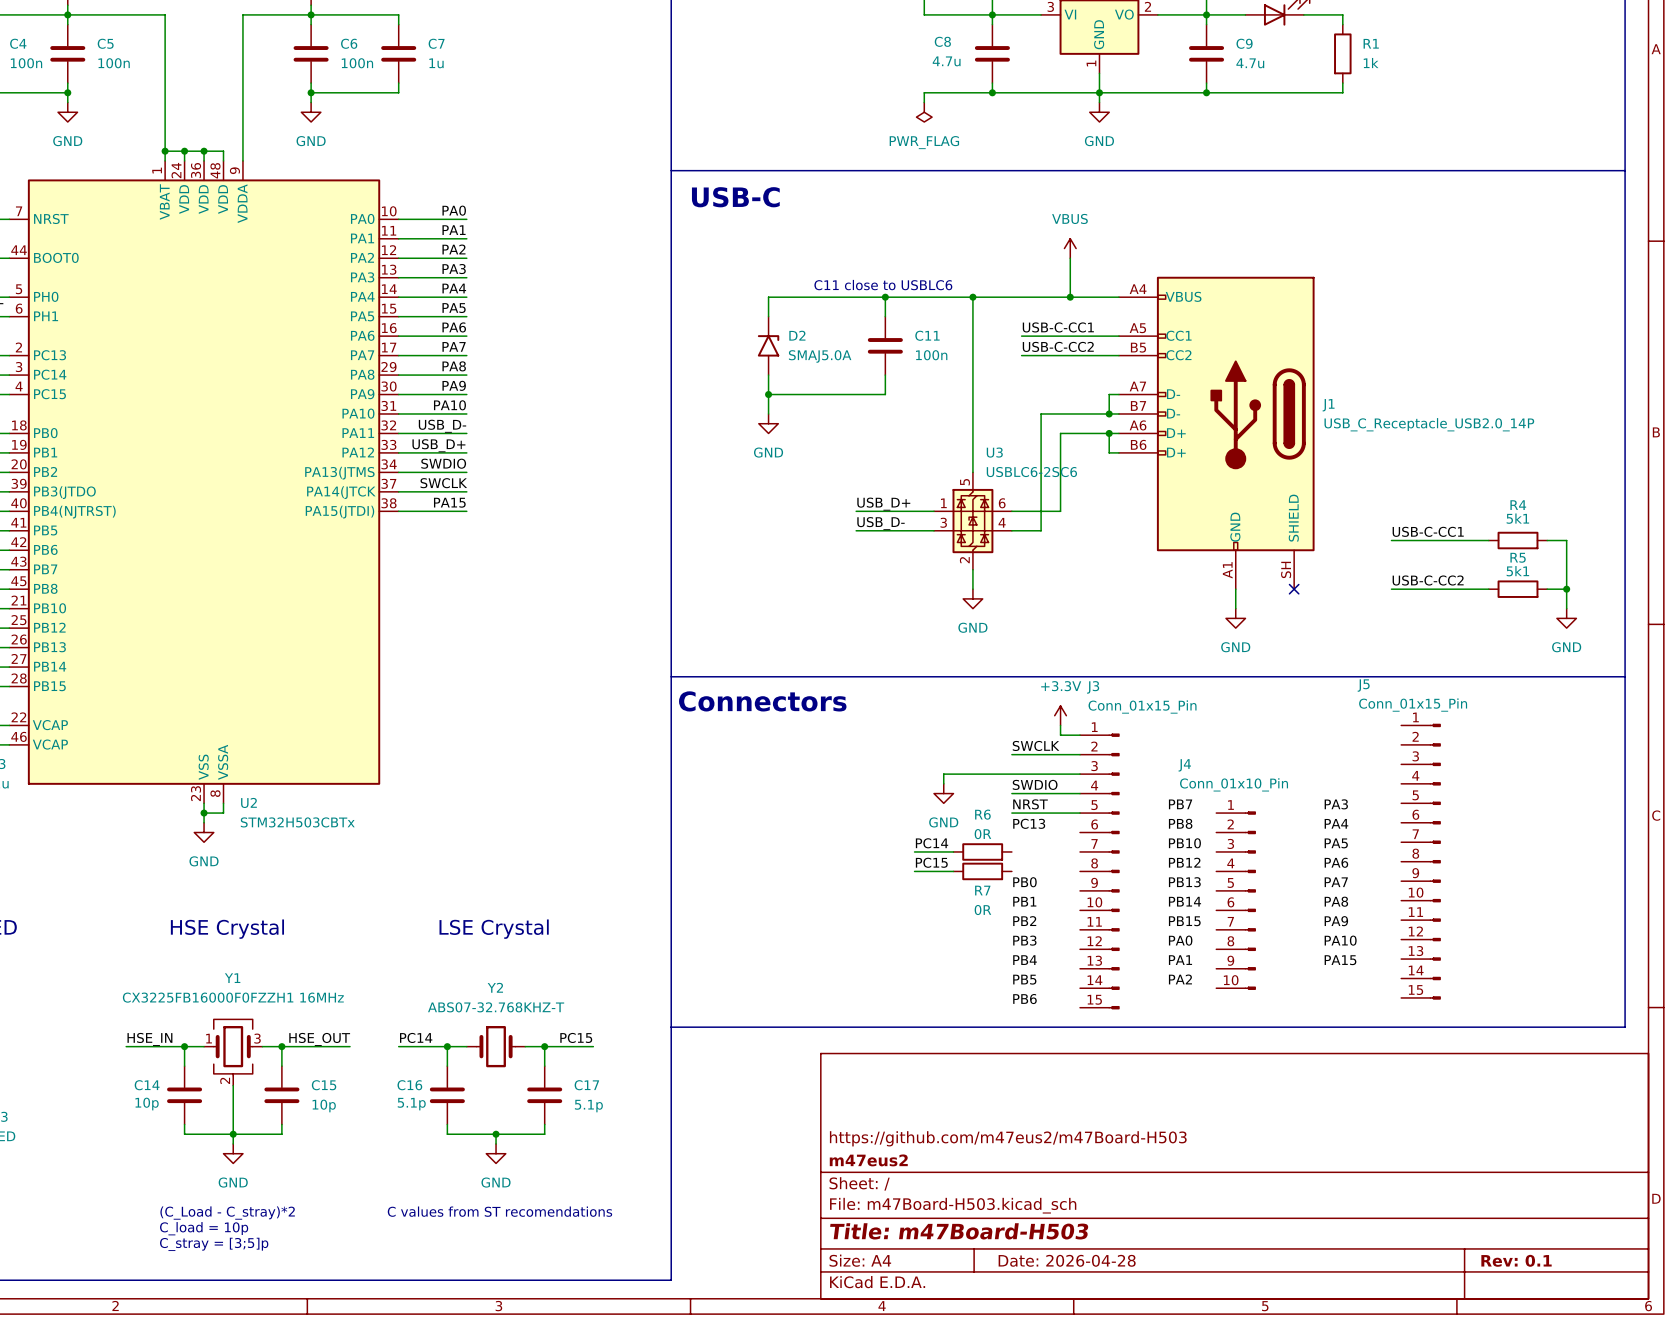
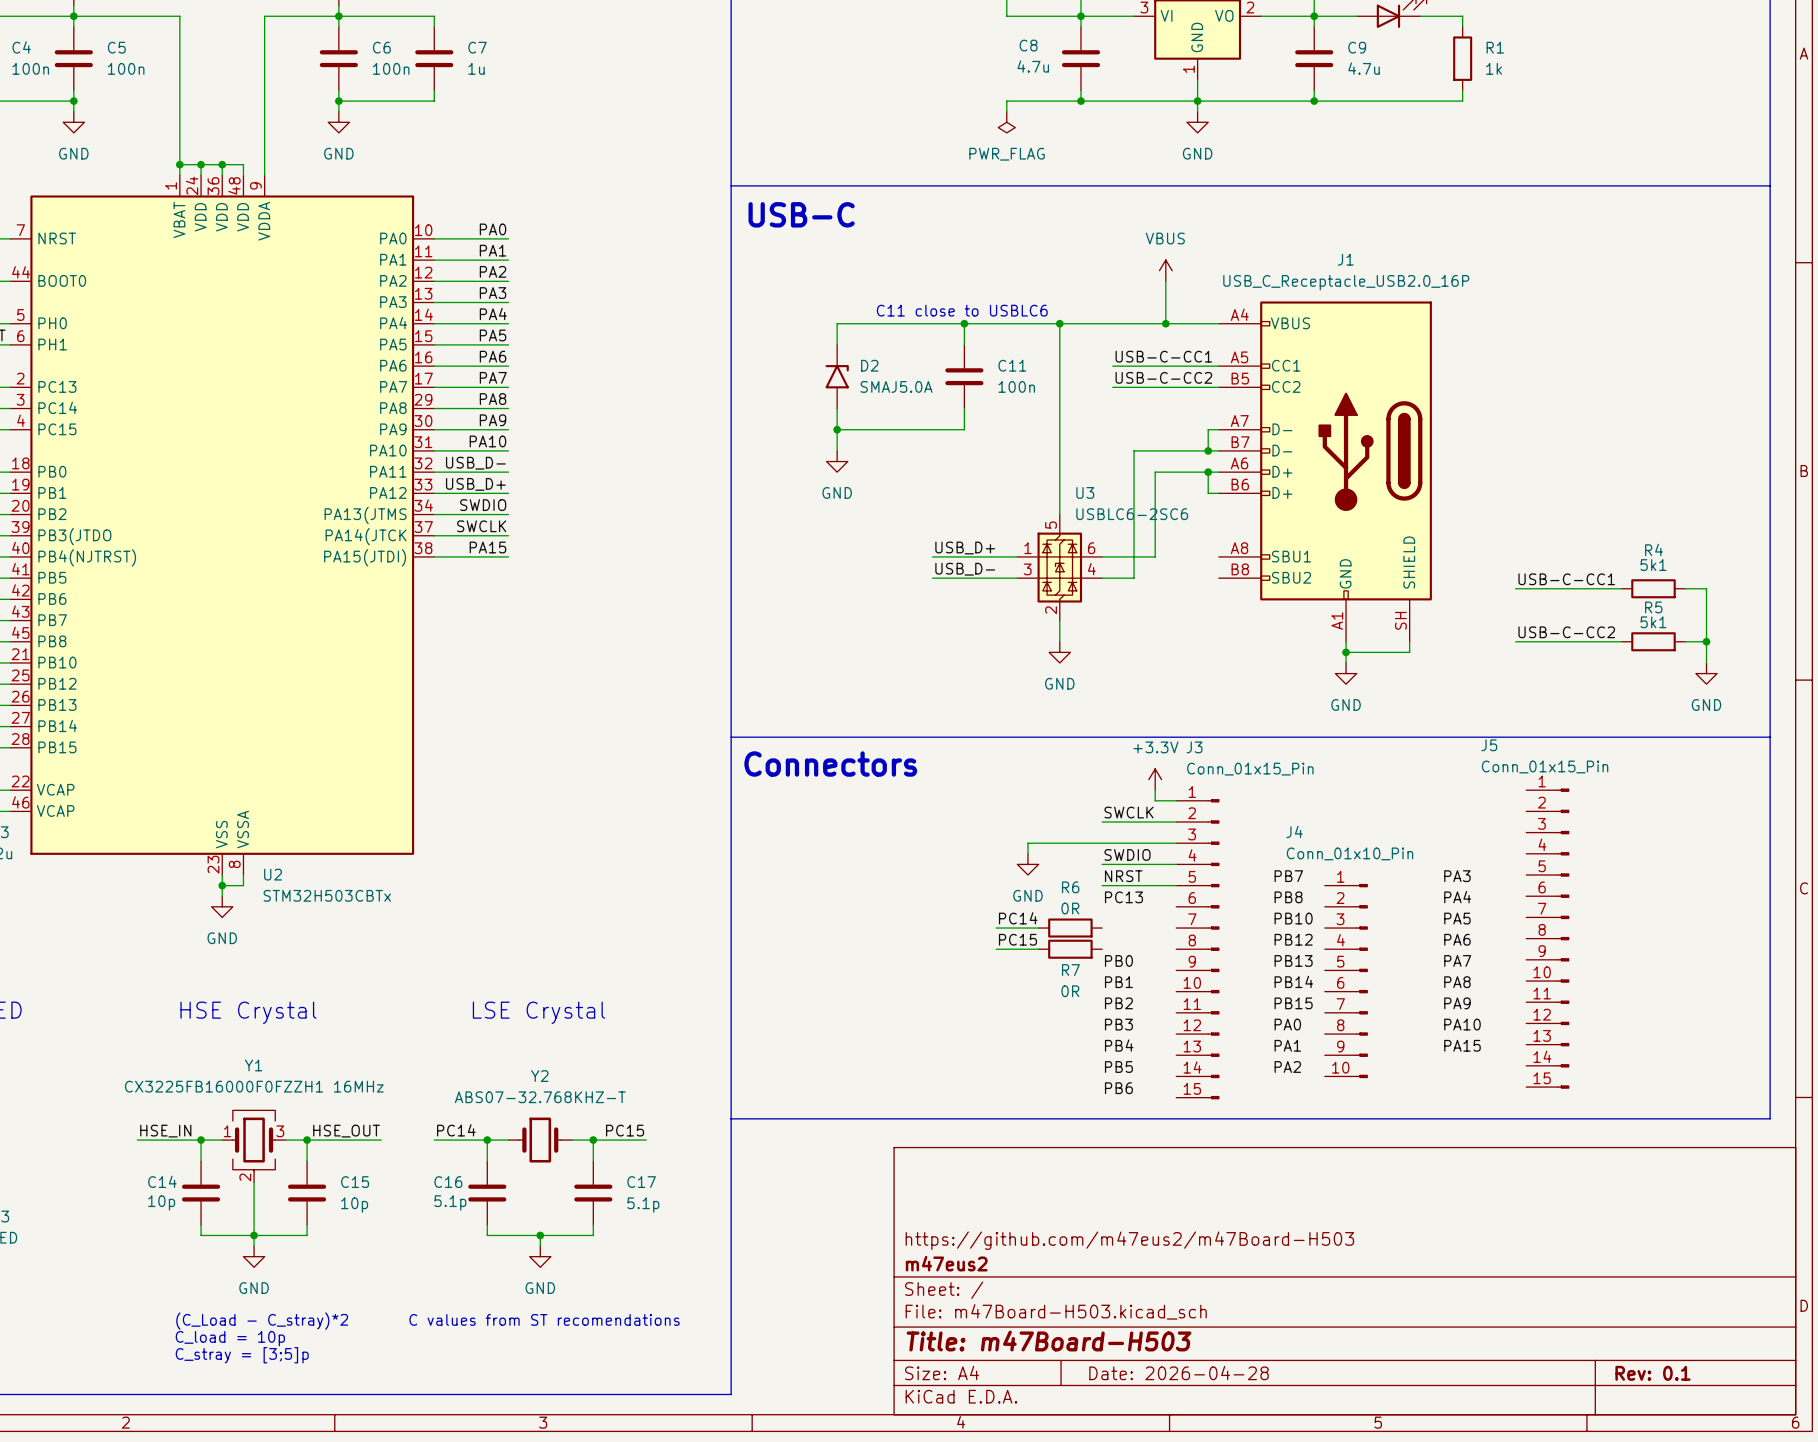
J1 symbol: [1118, 276, 1315, 590] -> [1218, 301, 1432, 642]
J1 name position: J1 (1328, 405) -> J1 (1345, 259)
J1 value: USB_C_Receptacle_USB2.0_14P (1429, 424) -> USB_C_Receptacle_USB2.0_16P (1346, 282)
wire: none -> (1409, 641) (1409, 652) (1346, 652)
no-connect mark: (1294, 589) -> none
junction: none -> (1346, 652)

